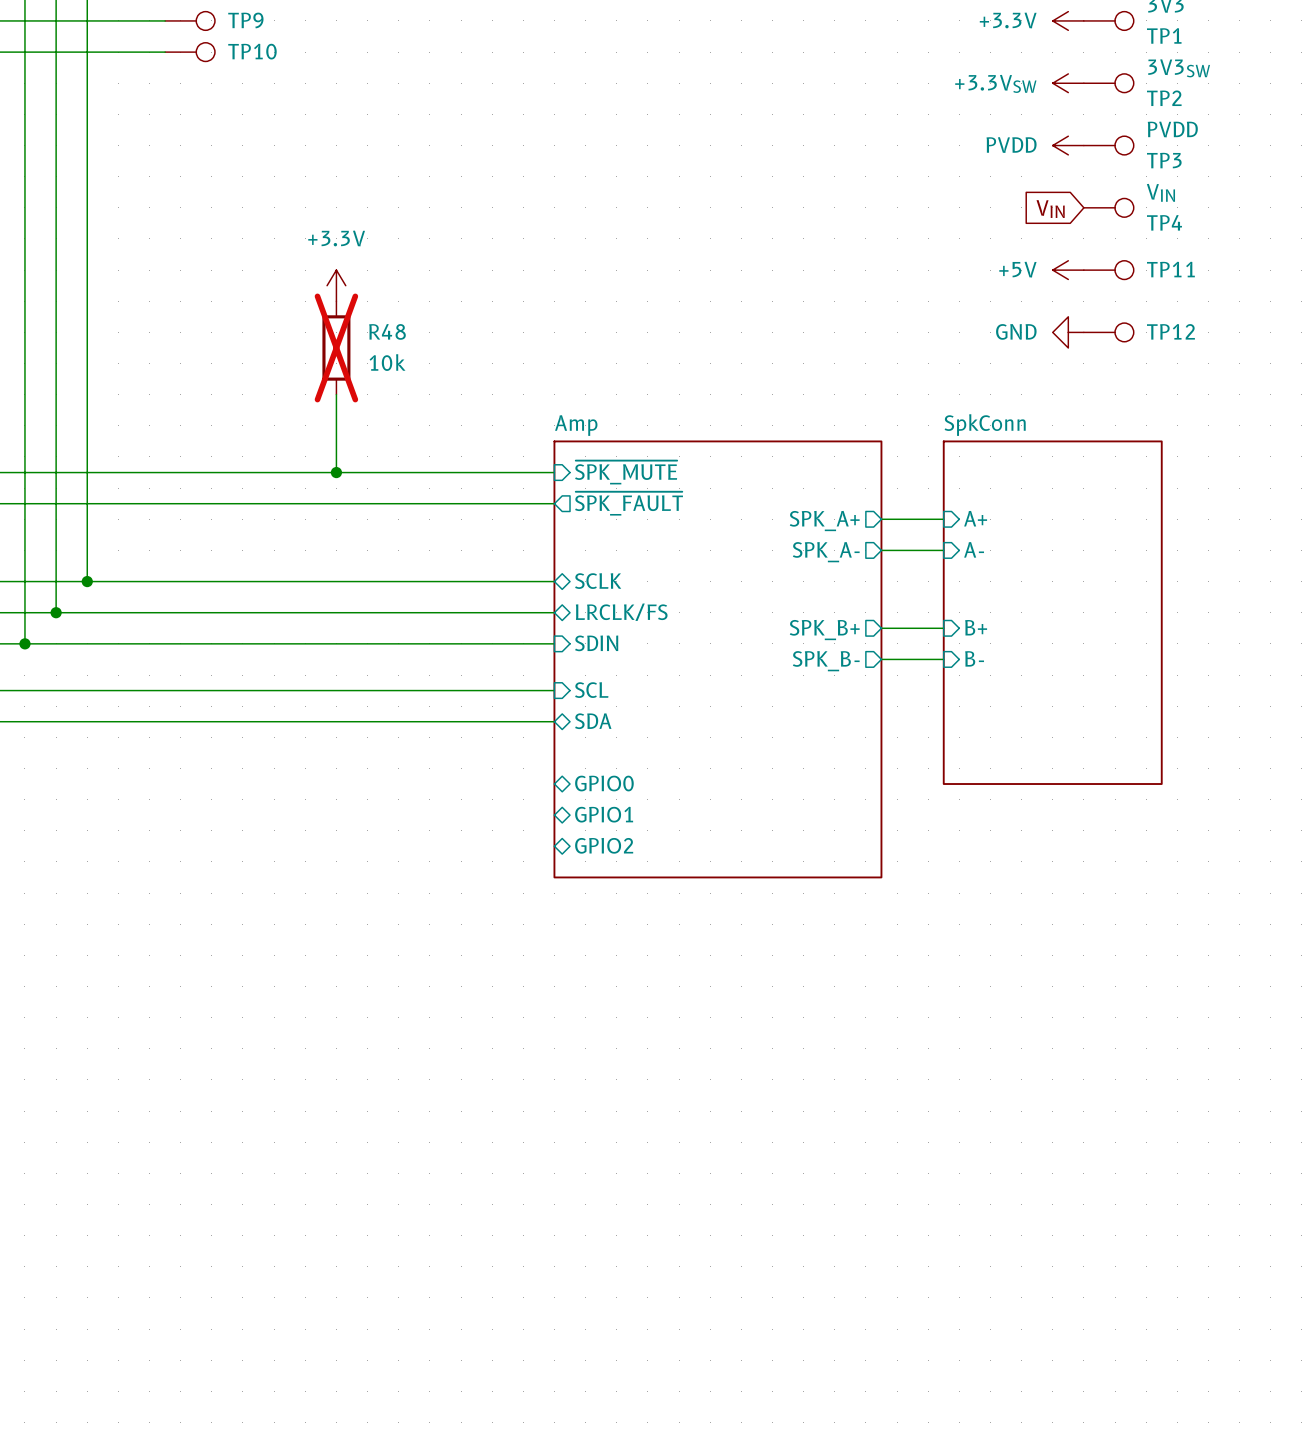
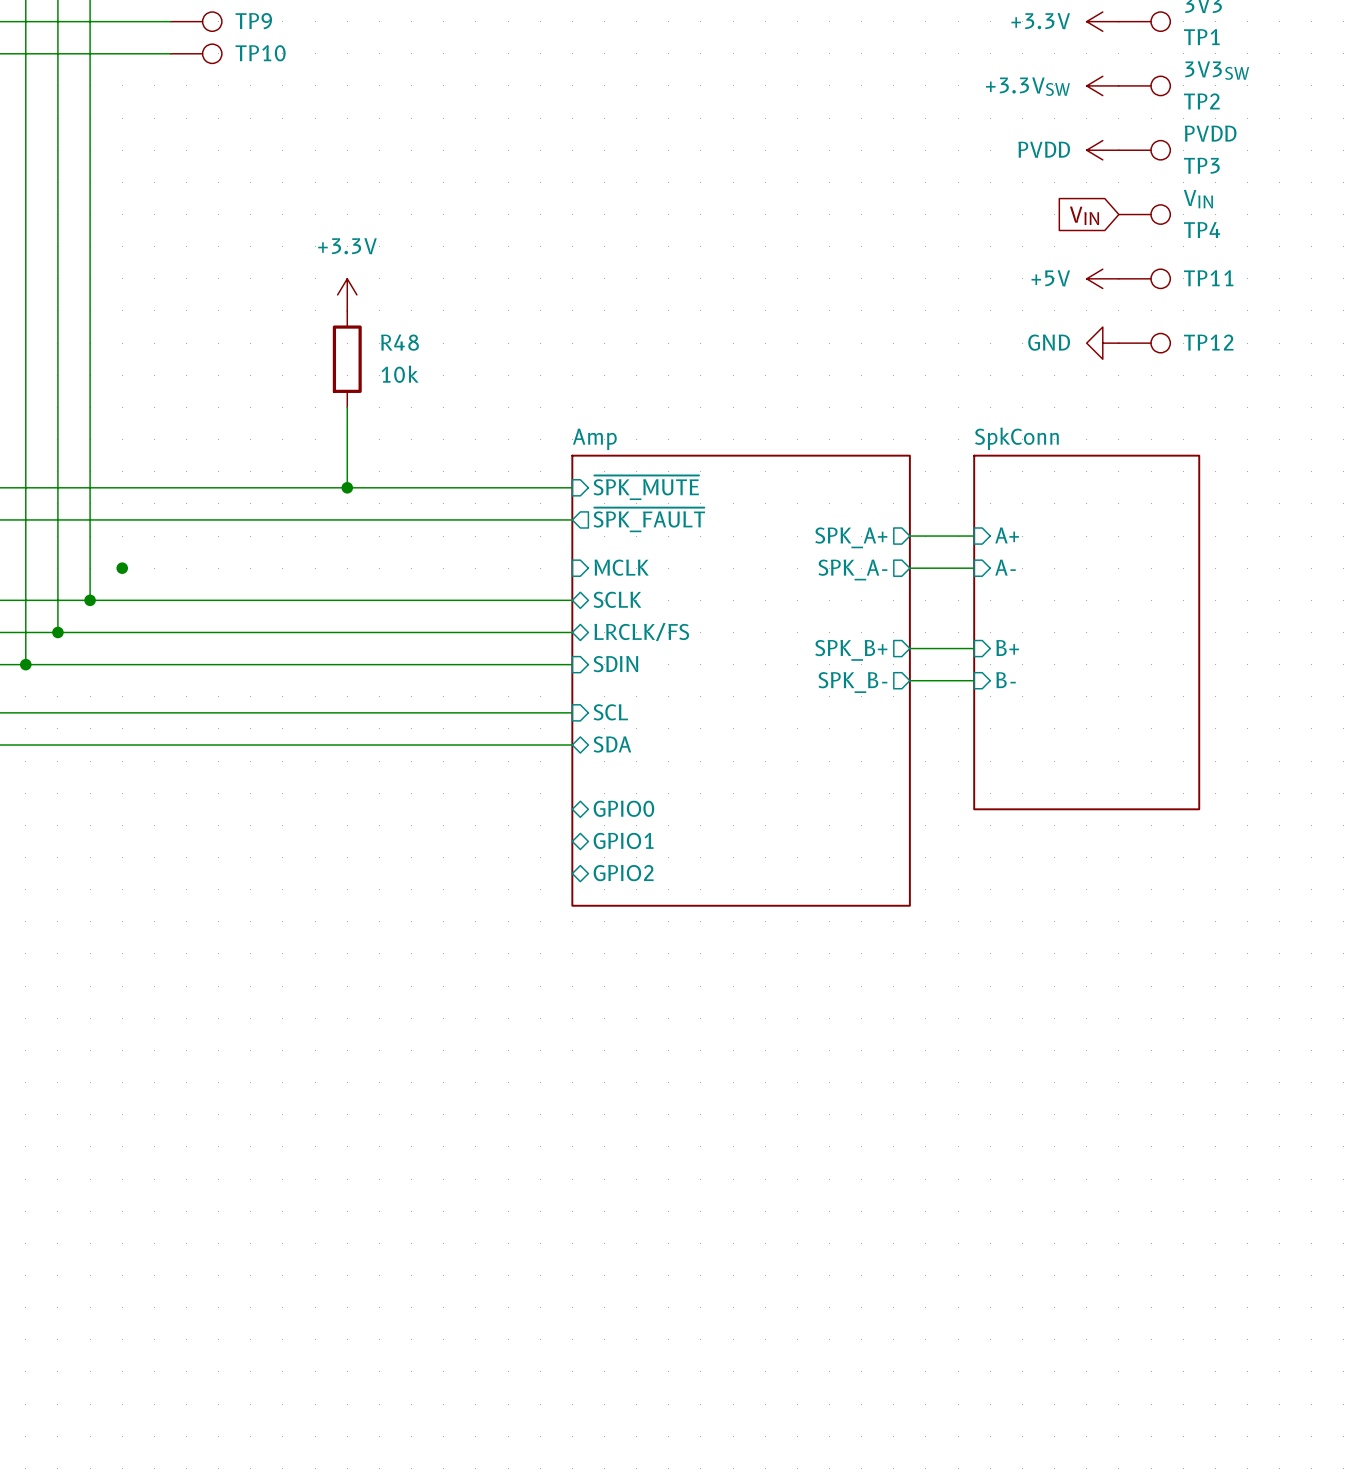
R48 do-not-place cross: (336, 347) -> none
sheet pin: none -> MCLK (621, 567)
junction: none -> (122, 568)

